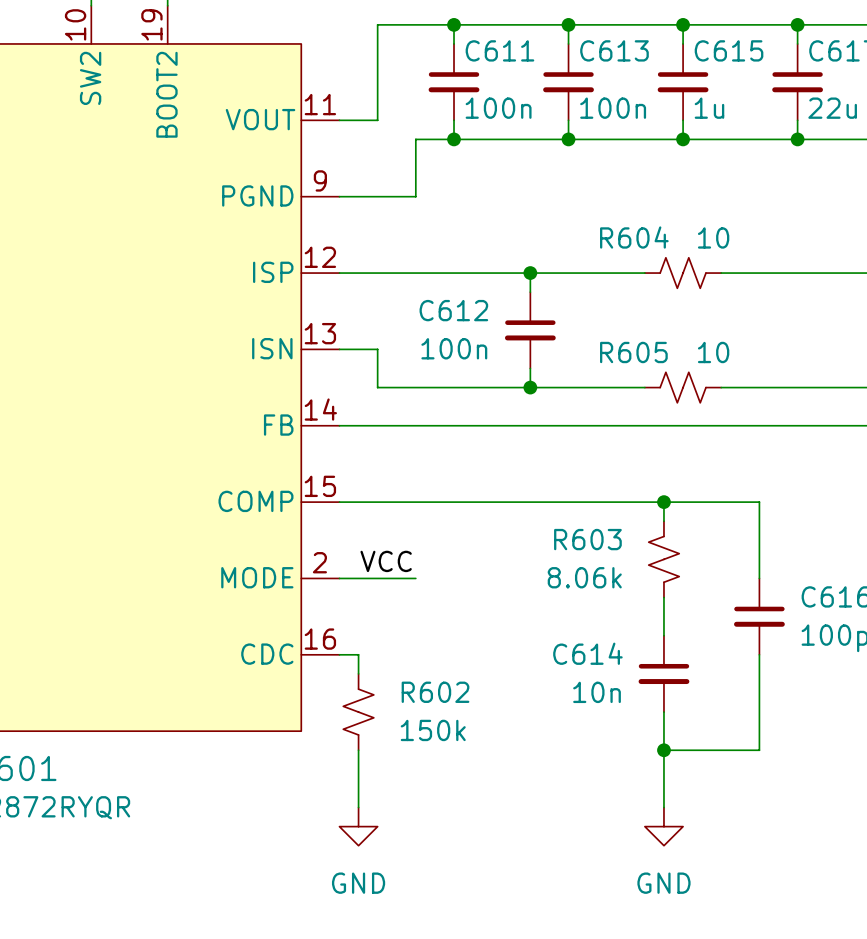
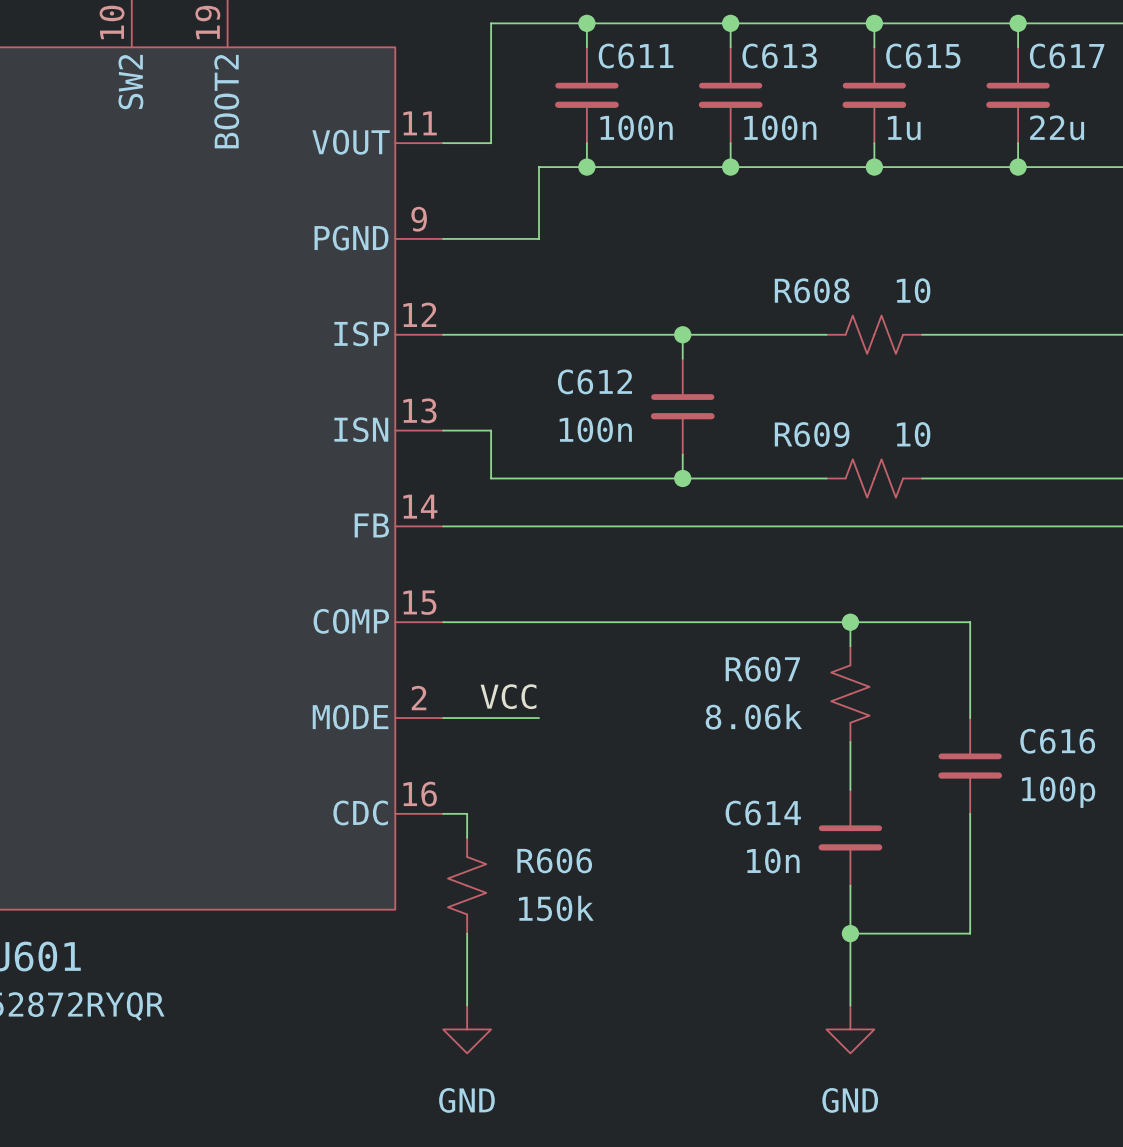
R604 name: R604 (634, 237) -> R608 (812, 290)
R605 name: R605 (633, 352) -> R609 (812, 434)
R603 name: R603 (587, 539) -> R607 (762, 669)
R602 name: R602 (435, 692) -> R606 (554, 860)

